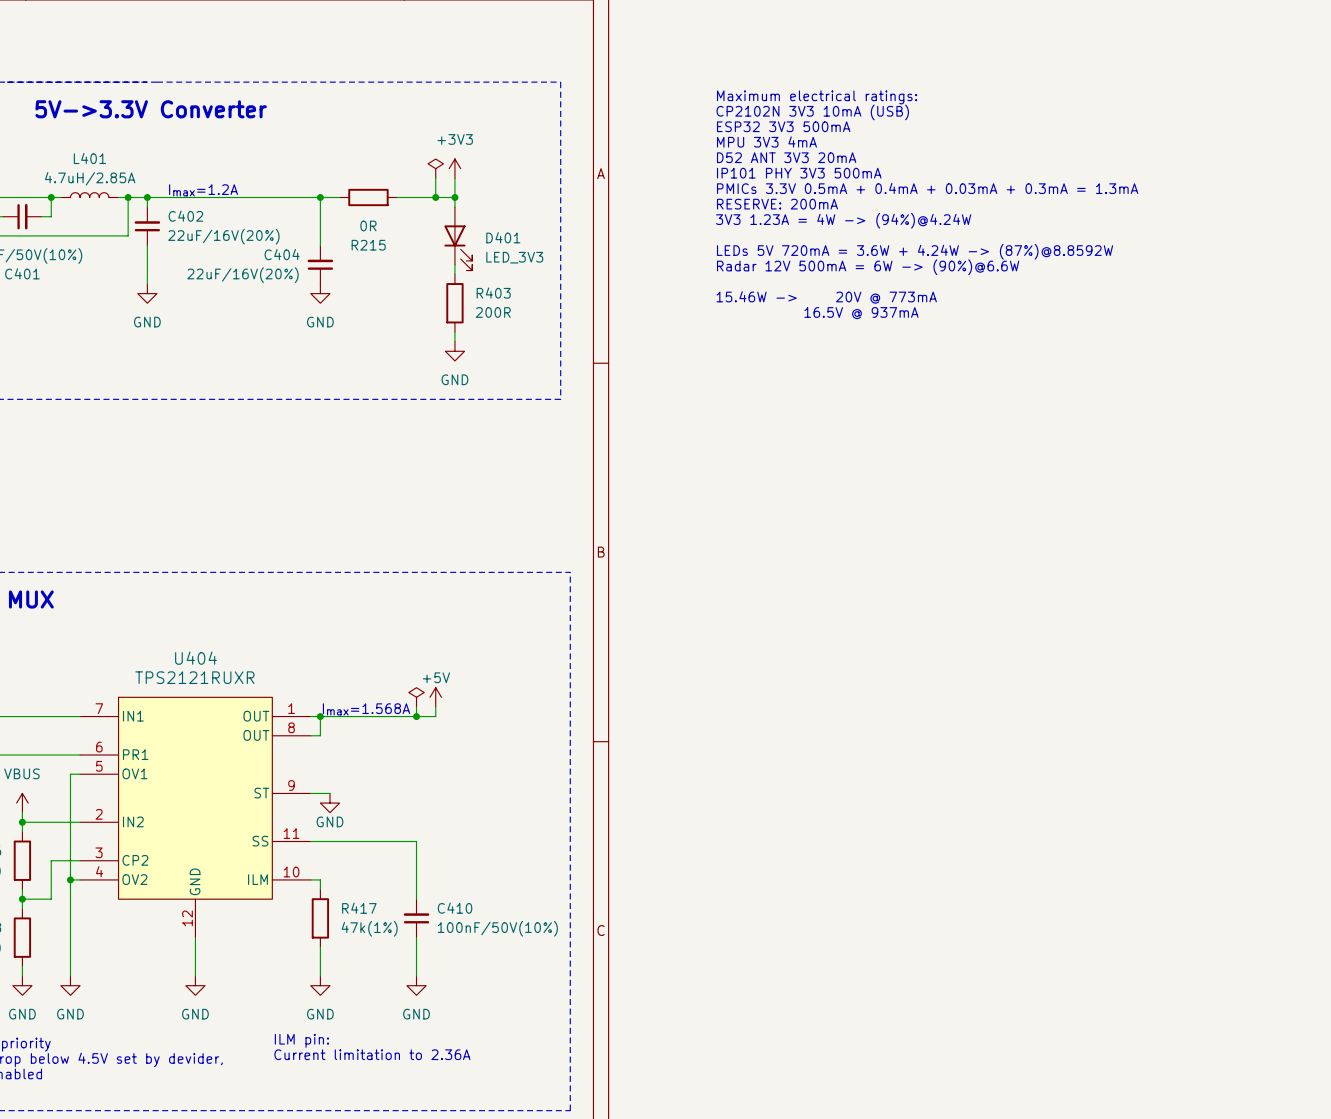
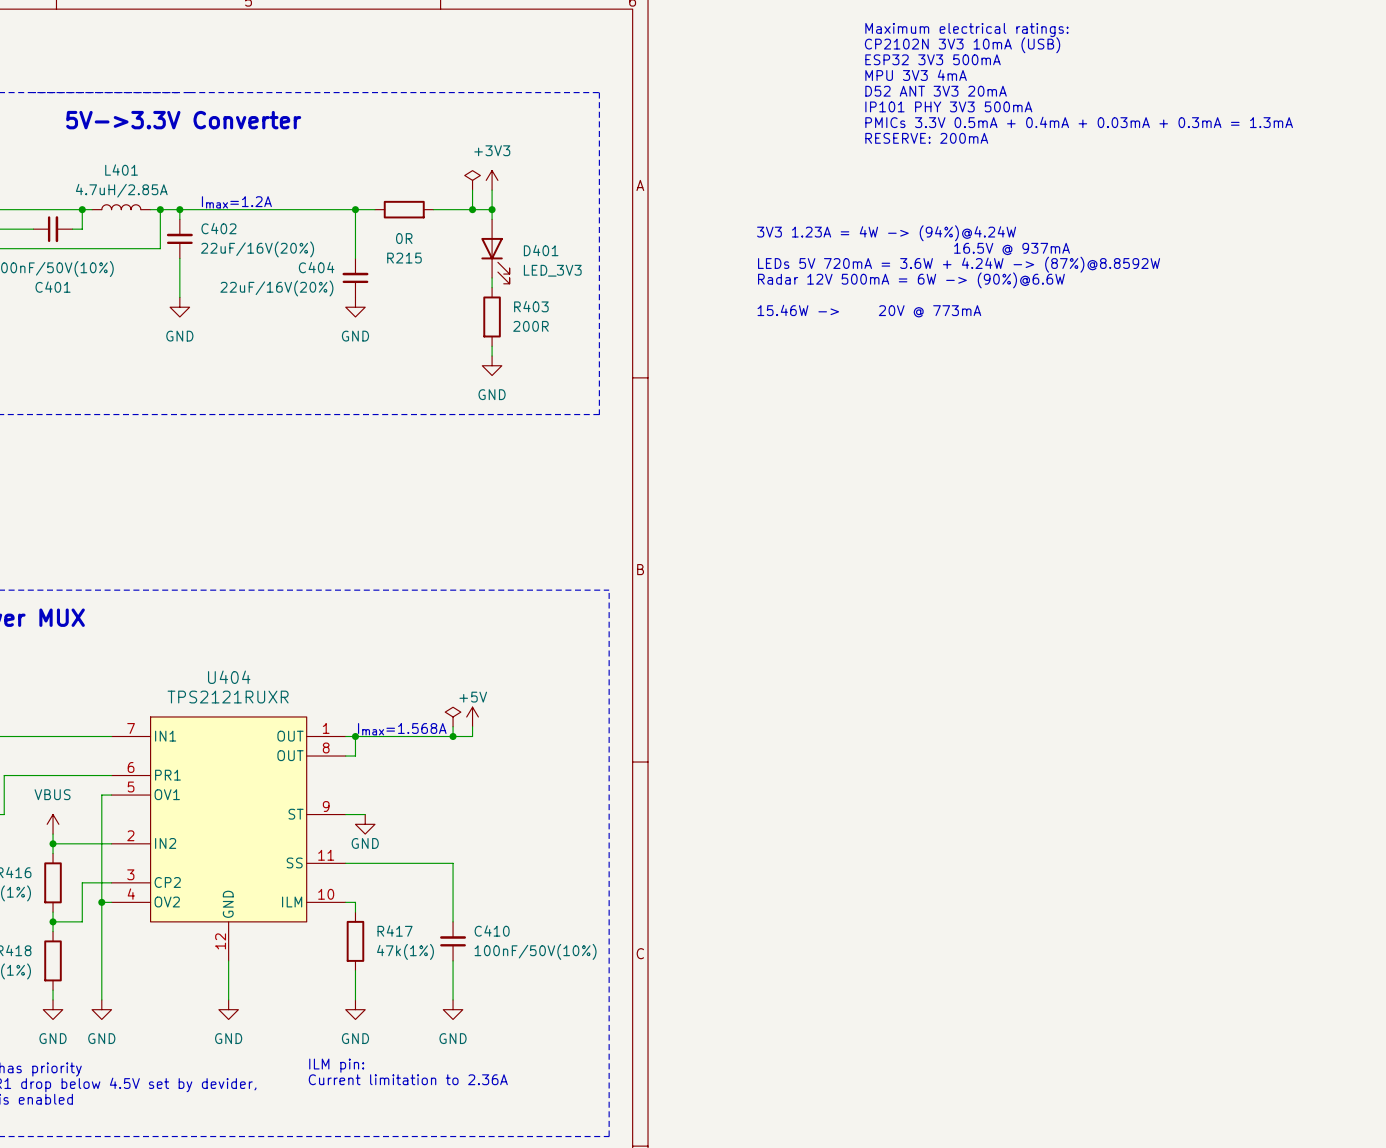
text position: Maximum electrical ratings: (817, 97) -> Maximum electrical ratings: (966, 30)
text position: CP2102N 3V3 10mA (USB) (812, 112) -> CP2102N 3V3 10mA (USB) (962, 45)
text position: ESP32 3V3 500mA (783, 126) -> ESP32 3V3 500mA (933, 59)
text position: MPU 3V3 4mA (766, 142) -> MPU 3V3 4mA (916, 75)
text position: D52 ANT 3V3 20mA (786, 157) -> D52 ANT 3V3 20mA (936, 91)
text position: IP101 PHY 3V3 500mA (799, 173) -> IP101 PHY 3V3 500mA (948, 106)
text position: PMICs 3.3V 0.5mA + 0.4mA + 0.03mA + 0.3mA = 1.3mA (927, 188) -> PMICs 3.3V 0.5mA + 0.4mA + 0.03mA + 0.3mA = 1.3mA (1079, 122)
text position: RESERVE: 200mA (777, 204) -> RESERVE: 200mA (926, 138)
text position: 16.5V @ 937mA (861, 313) -> 16.5V @ 937mA (1012, 248)

